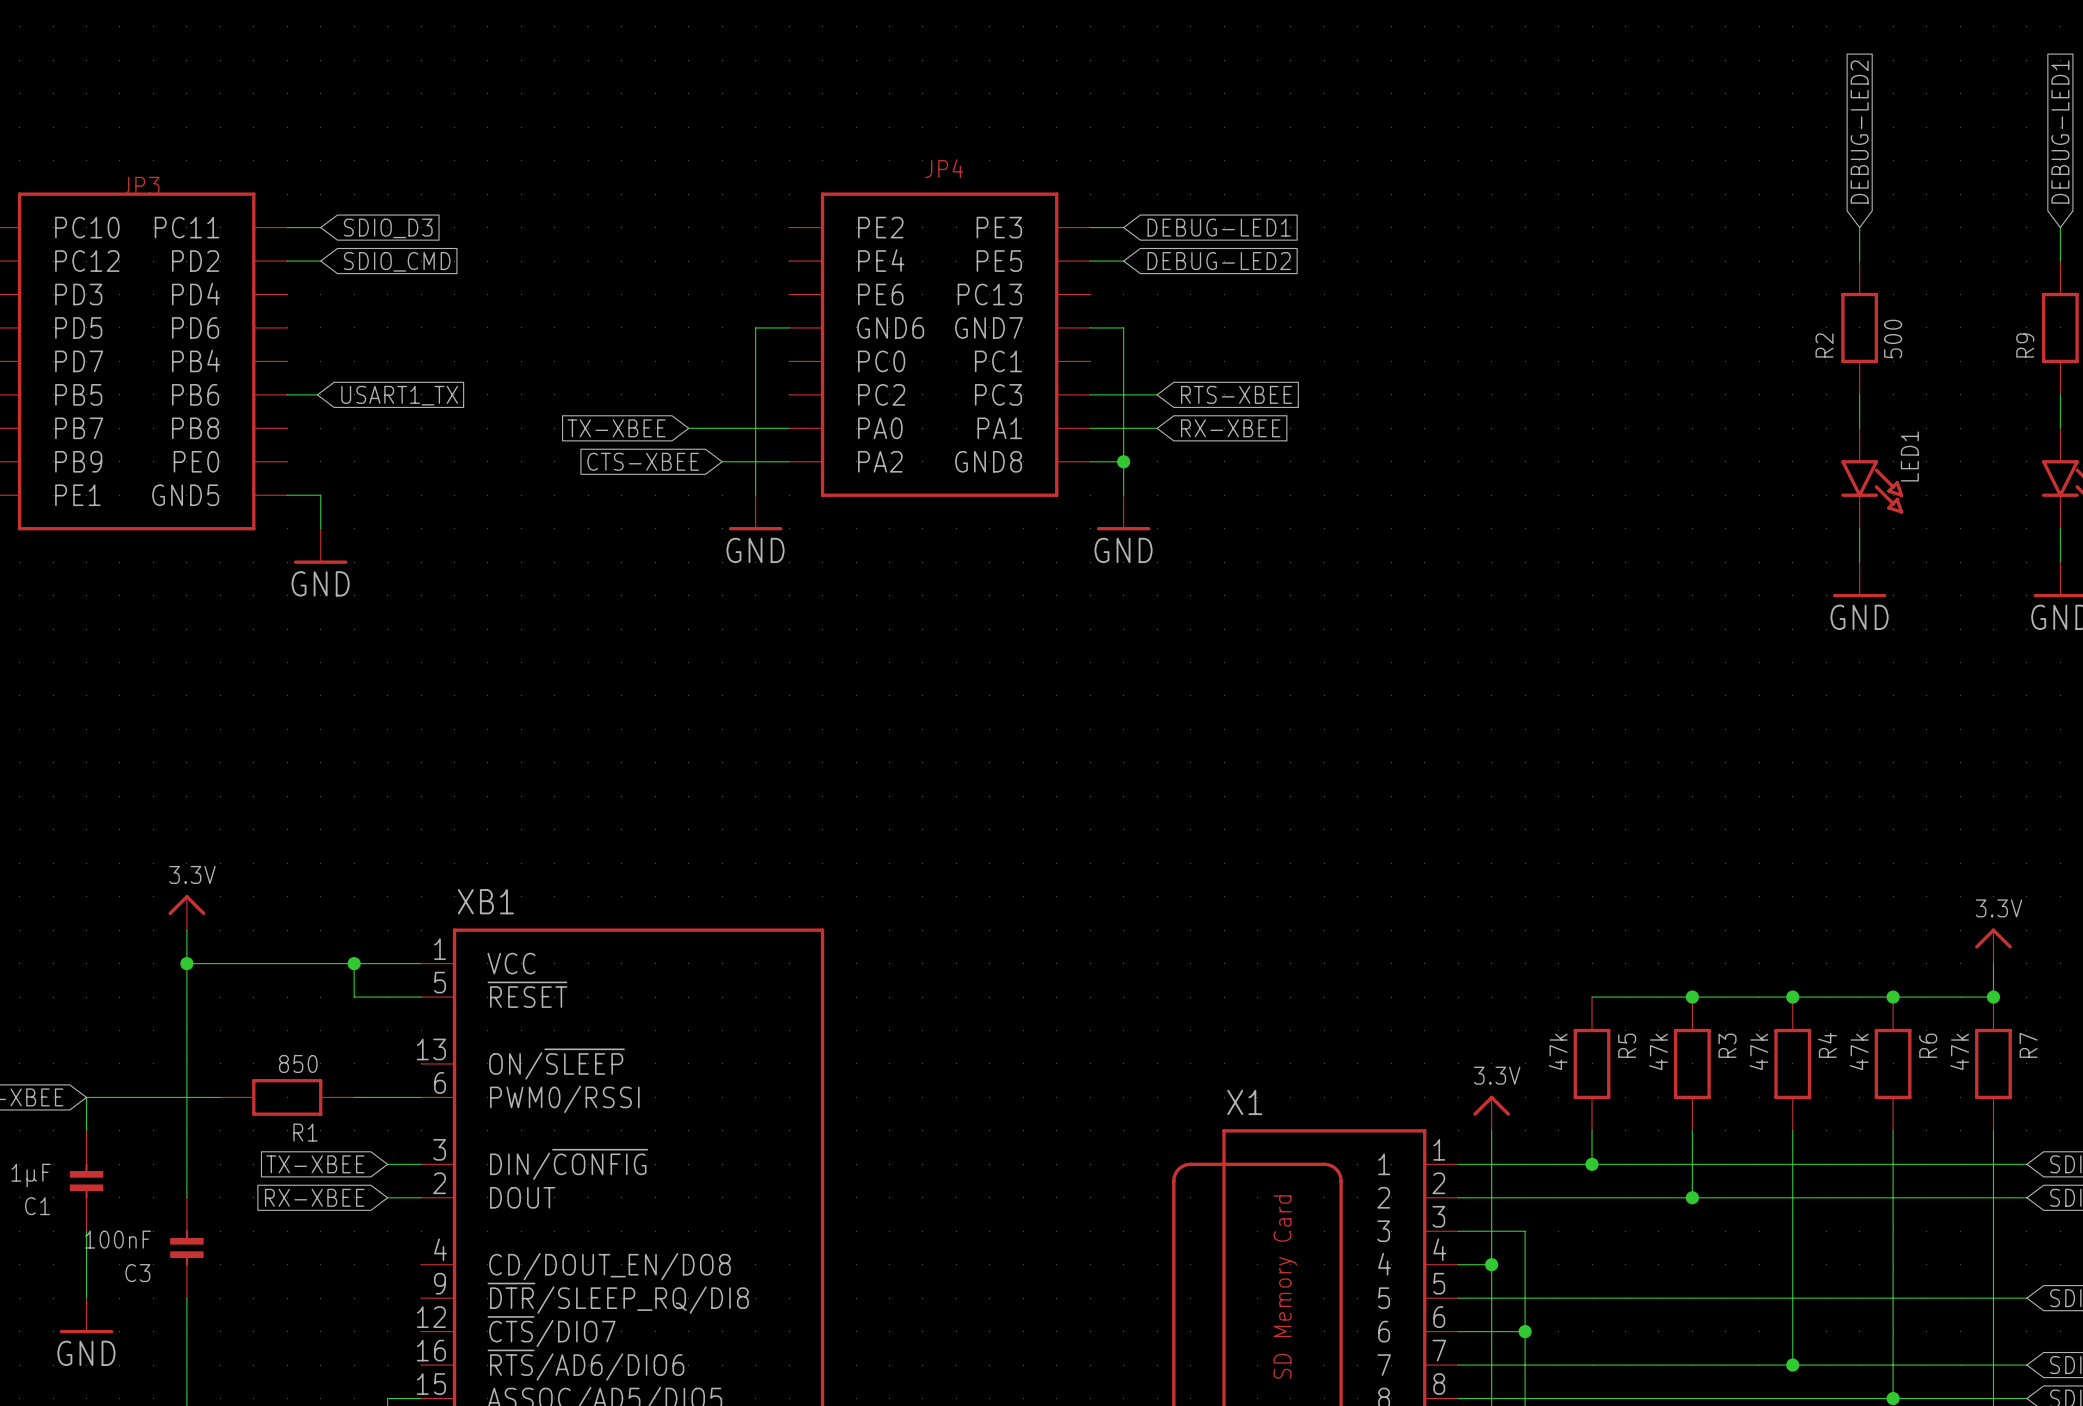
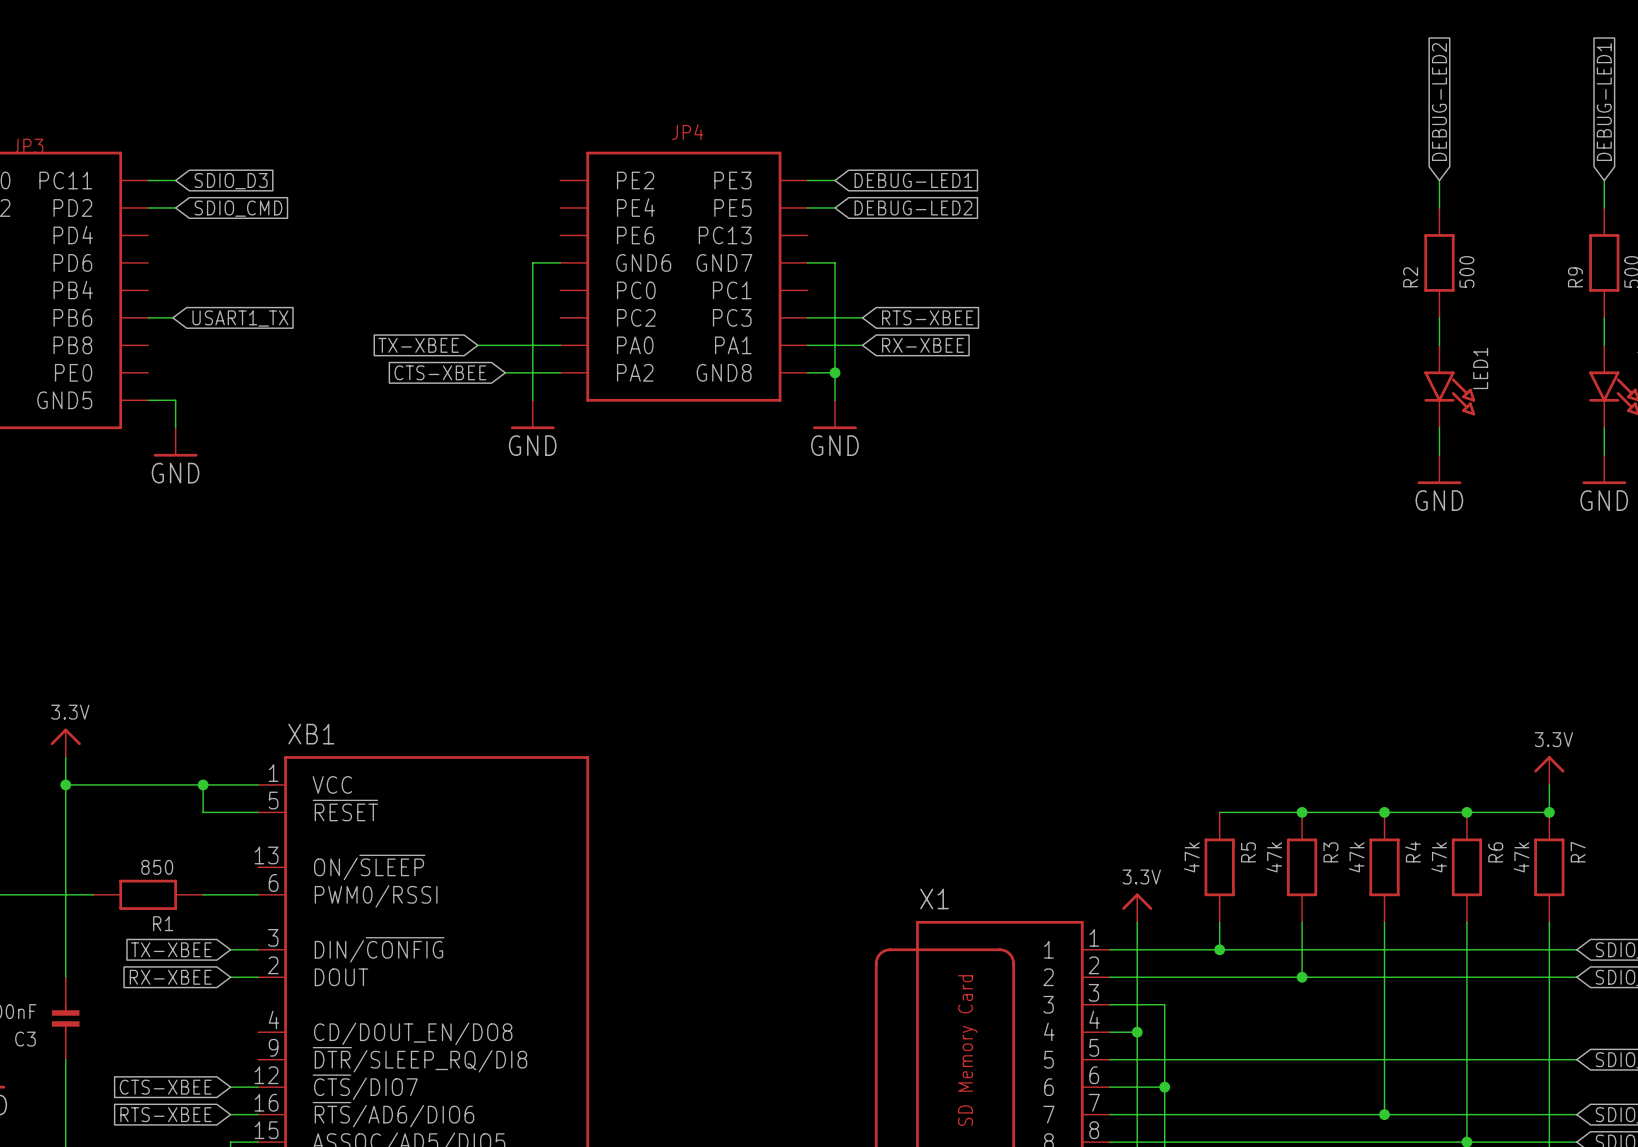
global label: none -> CTS-XBEE (165, 1087)
wire: none -> (230, 1087) (258, 1087)
global label: none -> RTS-XBEE (165, 1114)
wire: none -> (230, 1114) (258, 1114)

